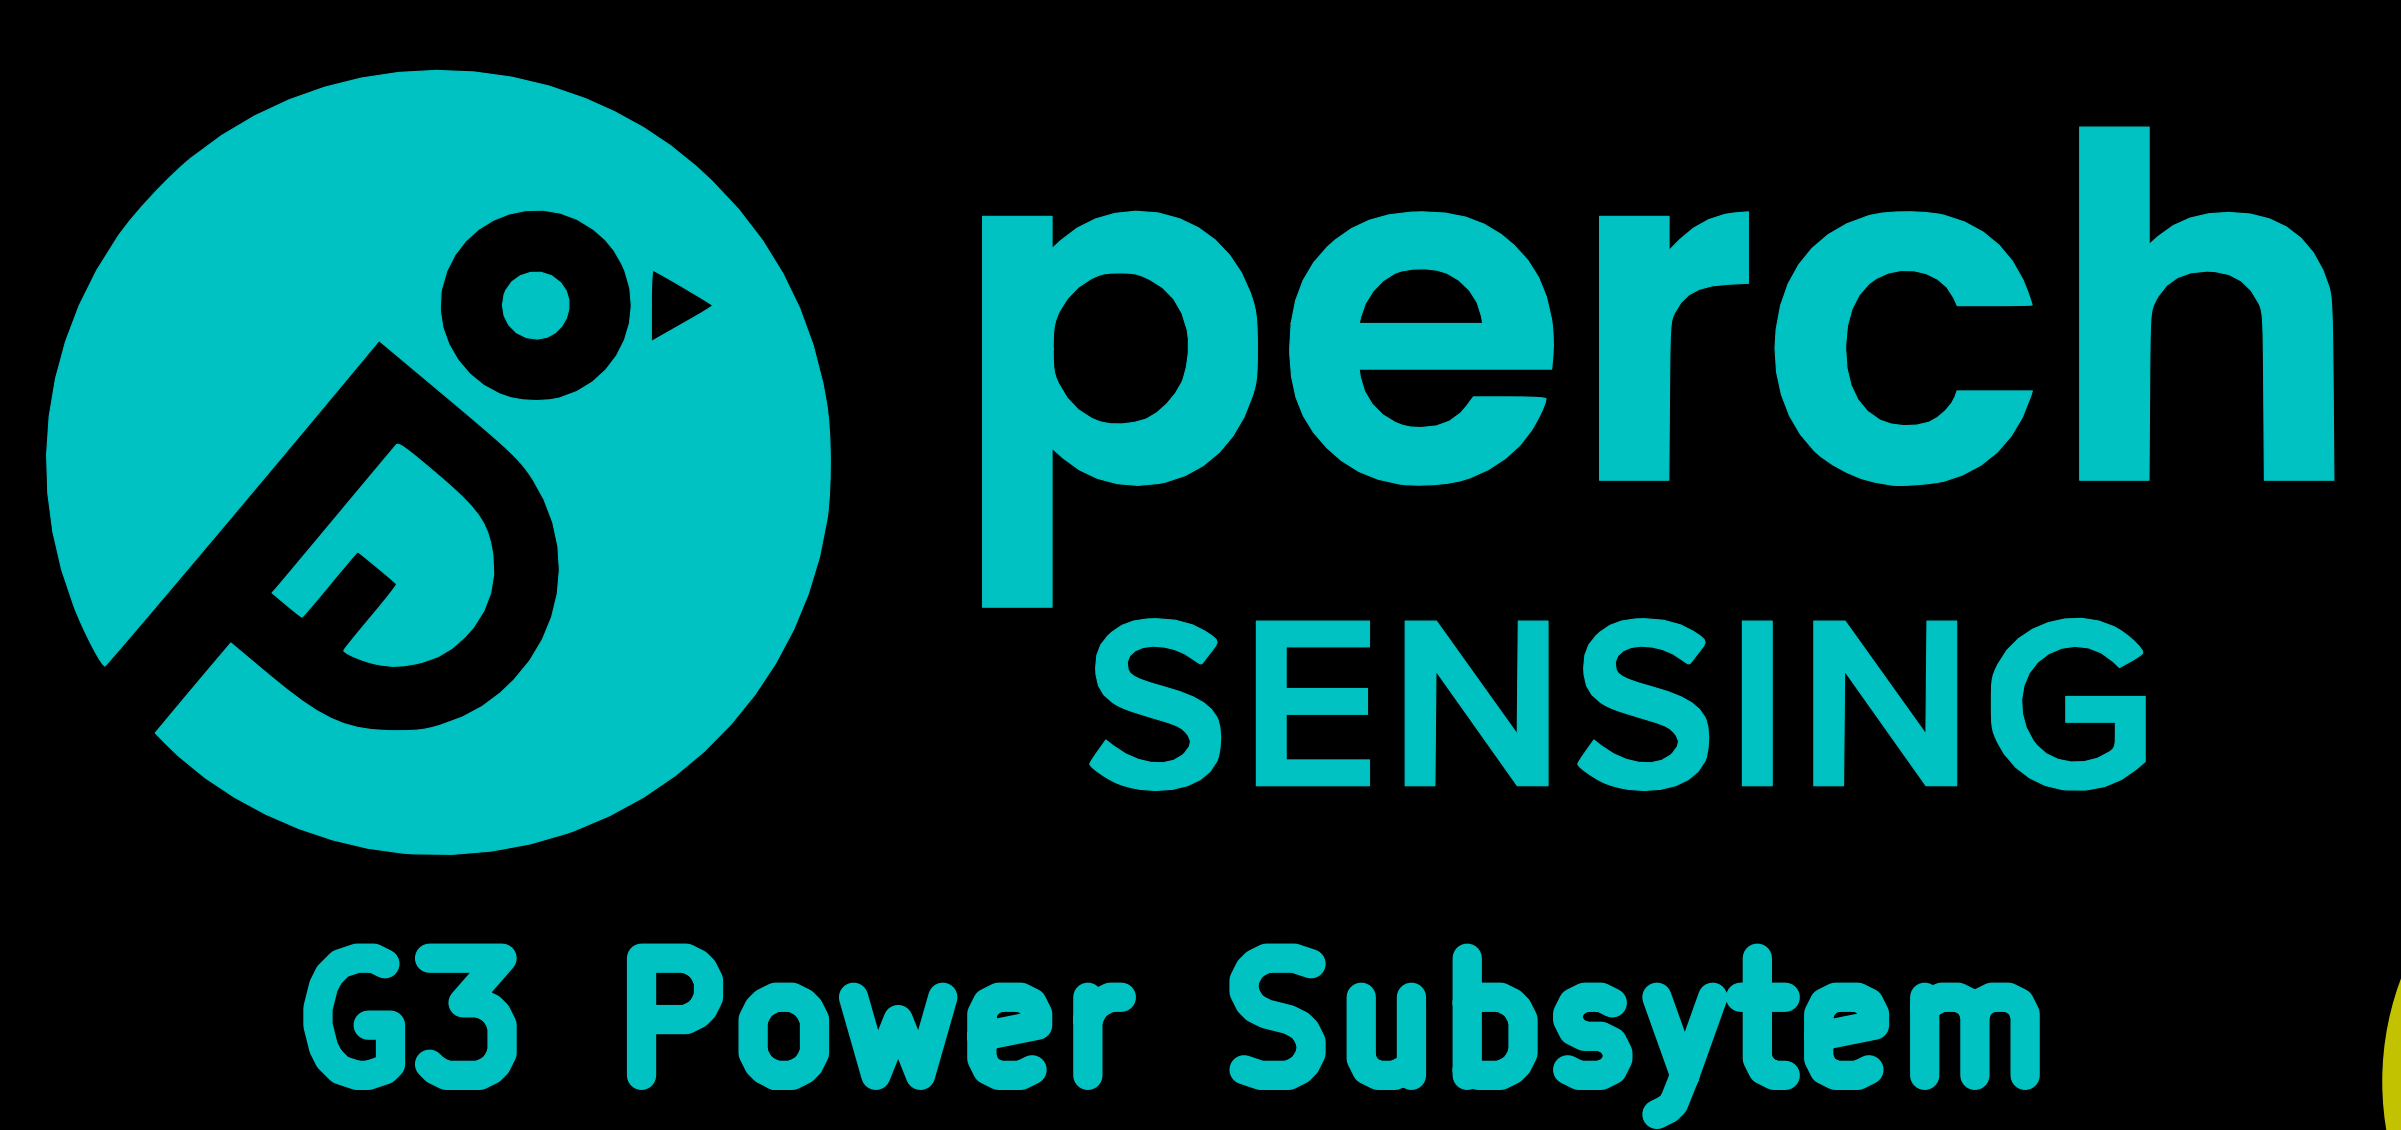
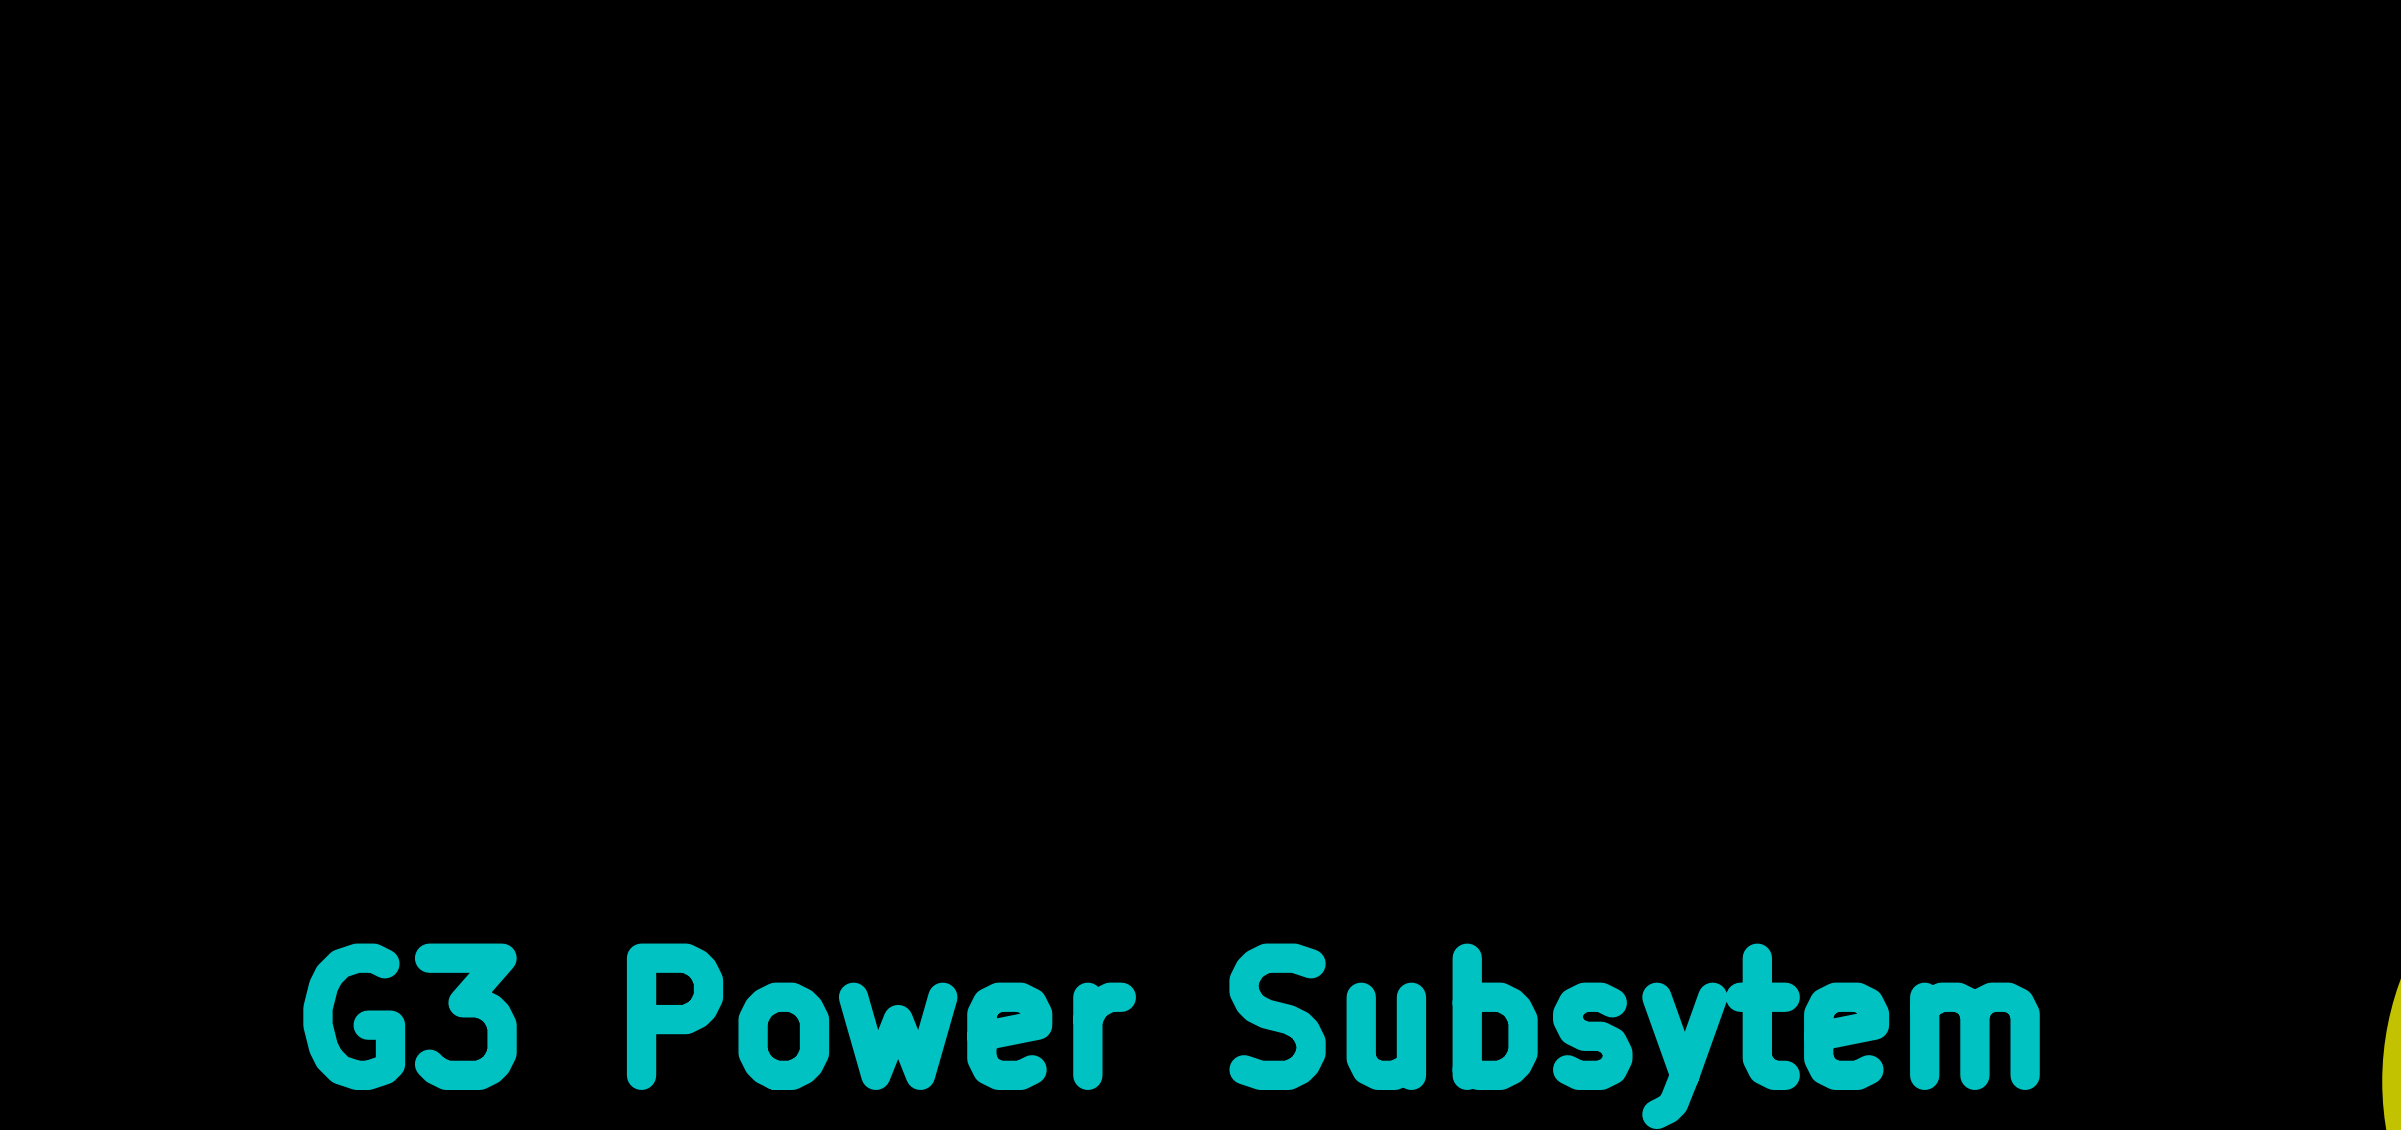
drawing: [46, 69, 2335, 855] -> none

